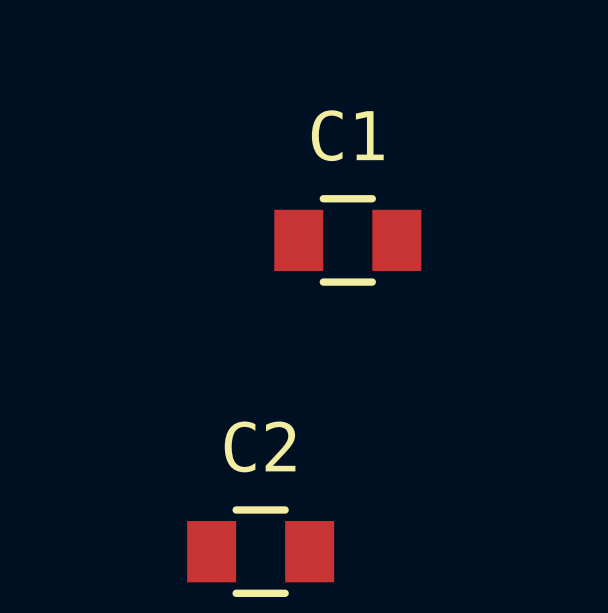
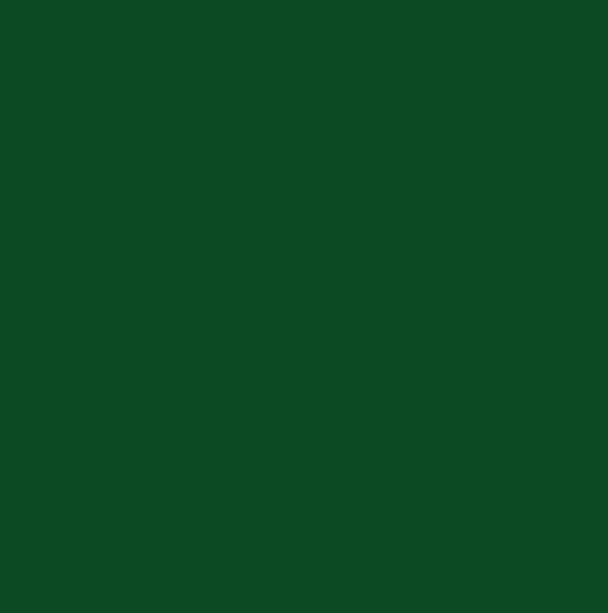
C1: (347, 240) -> none
C2: (260, 551) -> none

